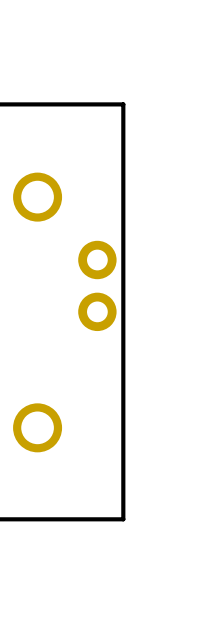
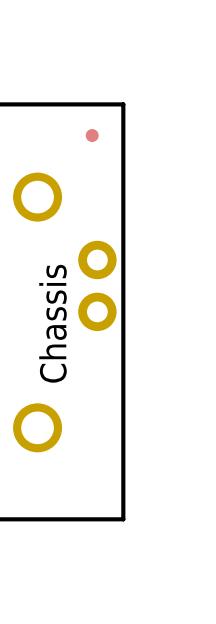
part: none -> (92, 135)
text: none -> Chassis (53, 323)

